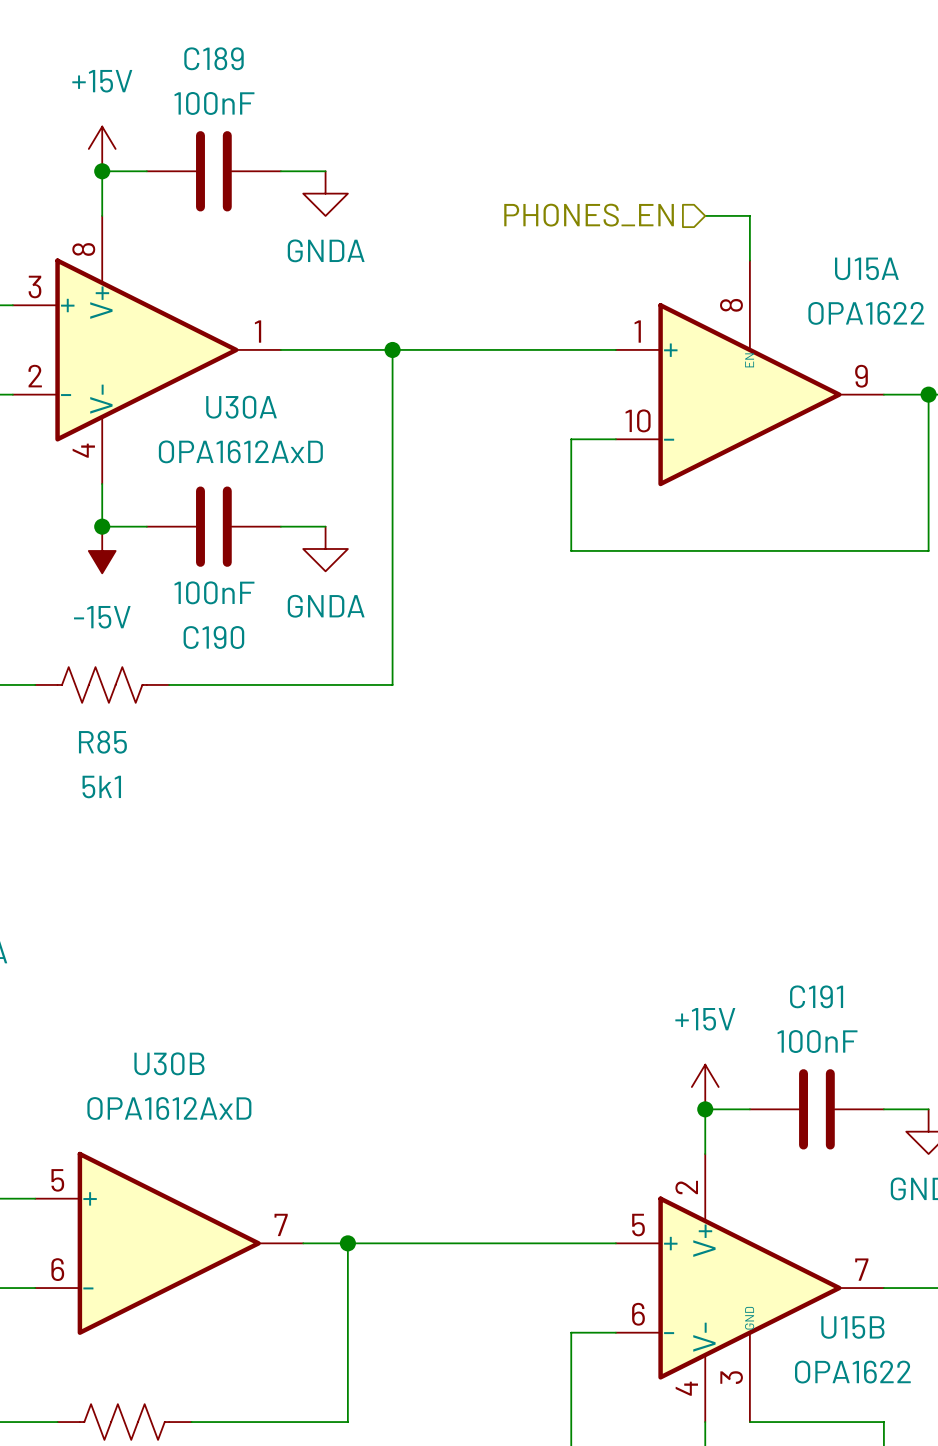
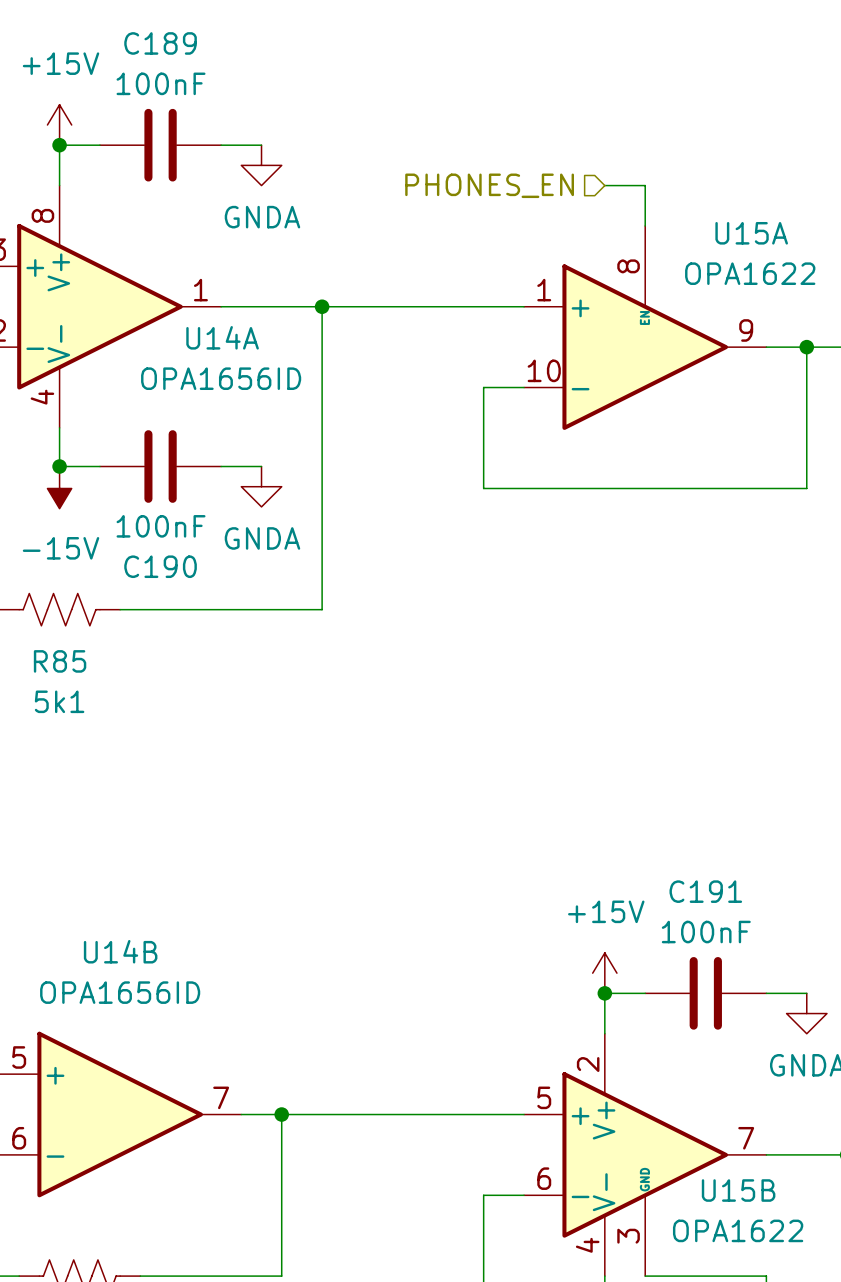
U30A name: U30A (241, 407) -> U14A (222, 337)
U30A value: OPA1612AxD (240, 451) -> OPA1656ID (221, 378)
U30B name: U30B (169, 1063) -> U14B (120, 951)
U30B value: OPA1612AxD (169, 1108) -> OPA1656ID (120, 992)

